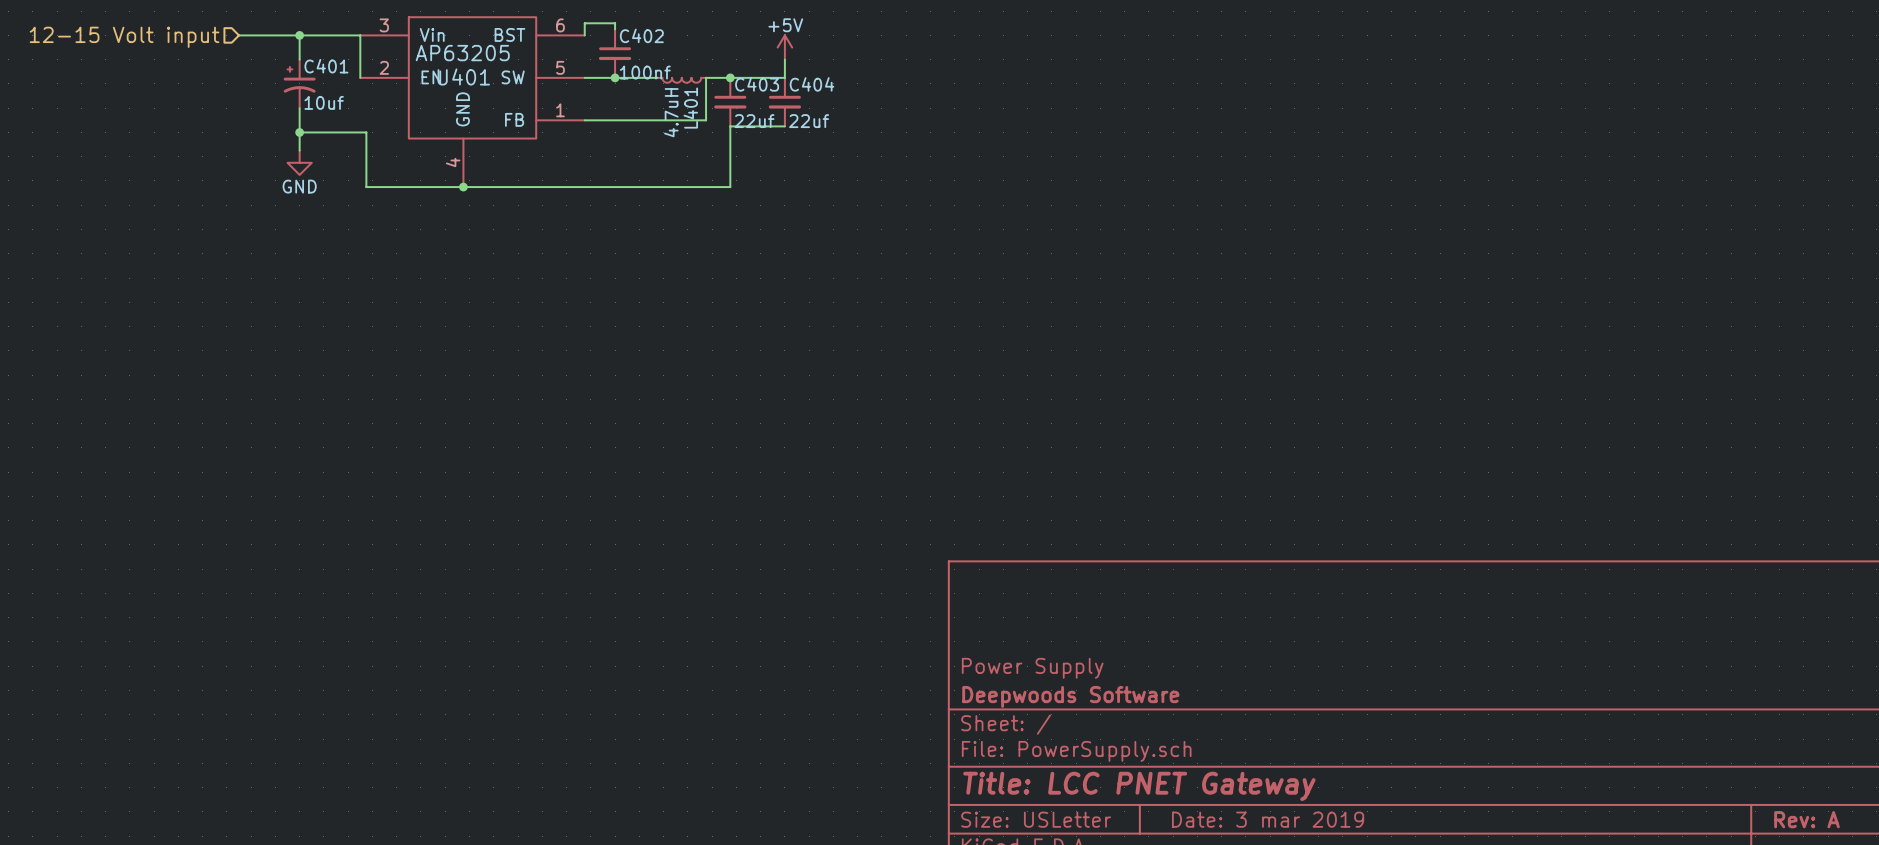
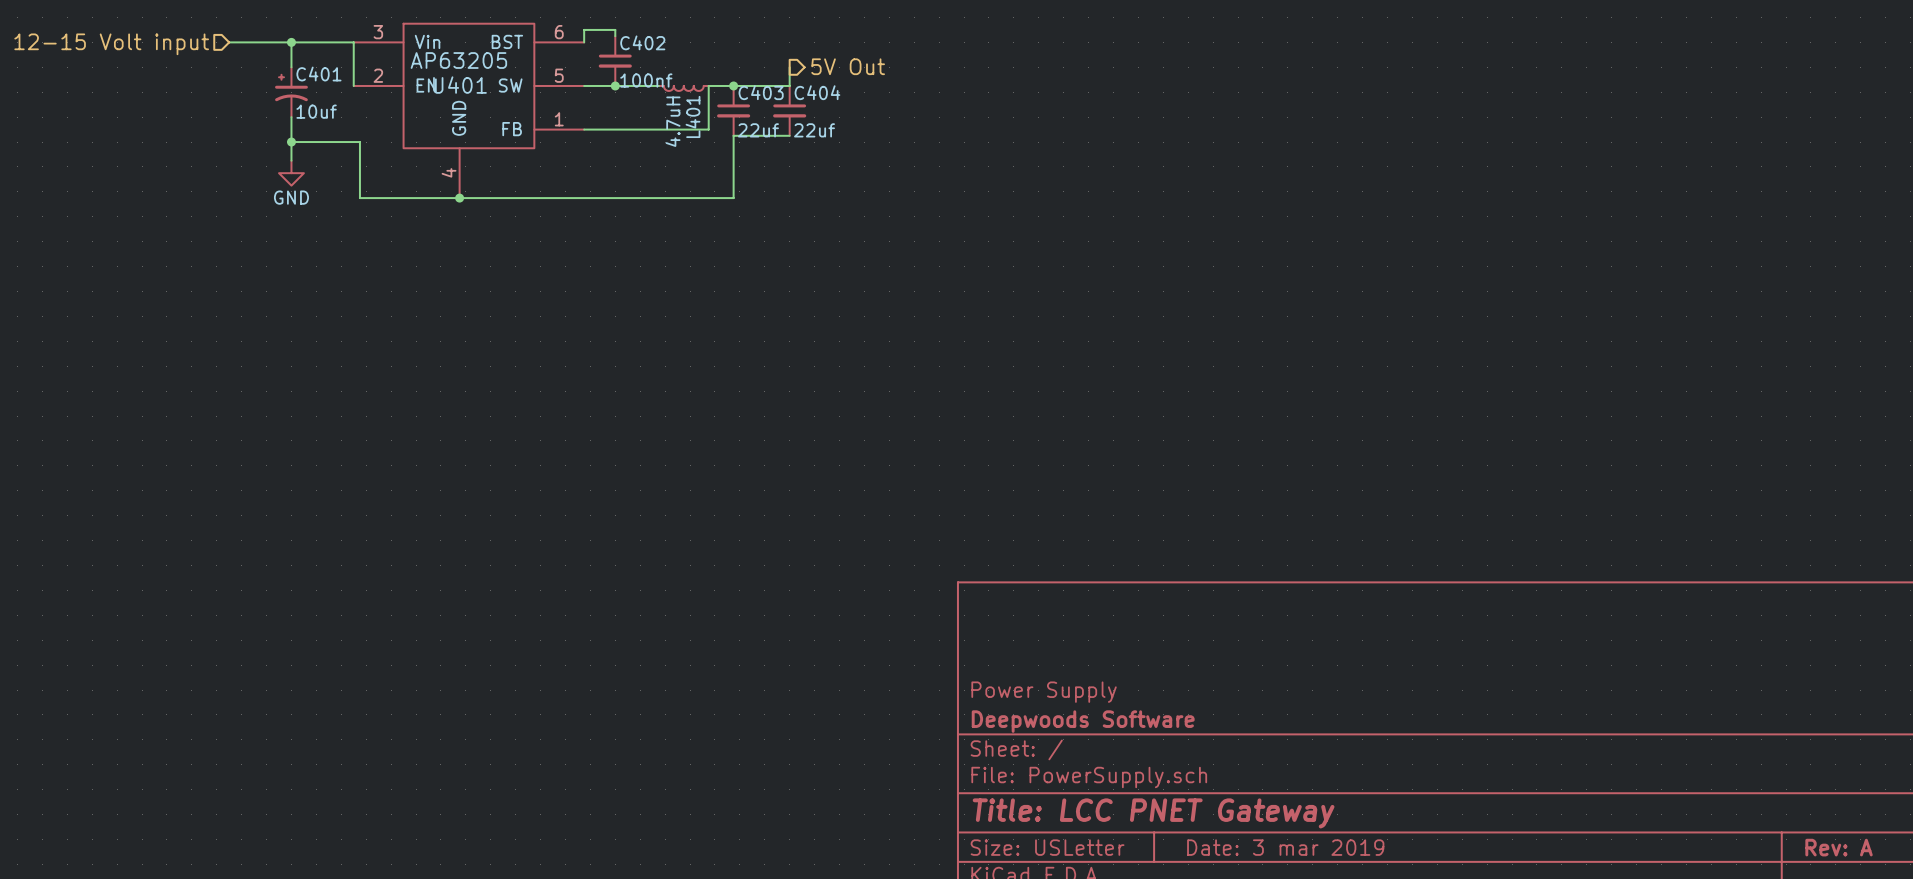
power symbol: +5V (784, 47) -> none
hierarchical label: none -> 5V Out (848, 66)

